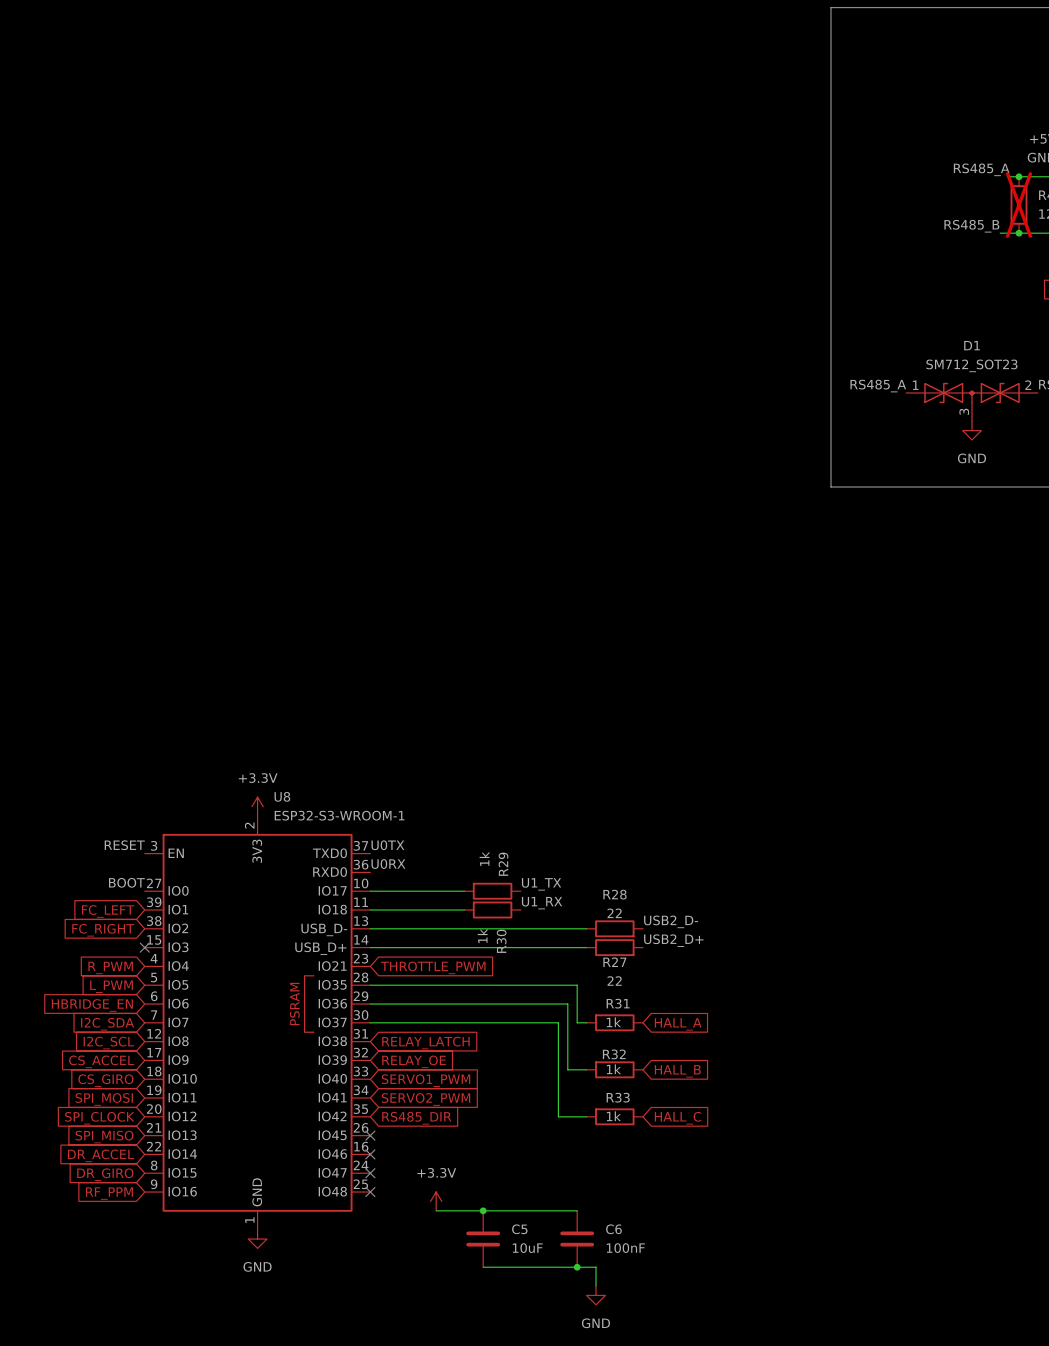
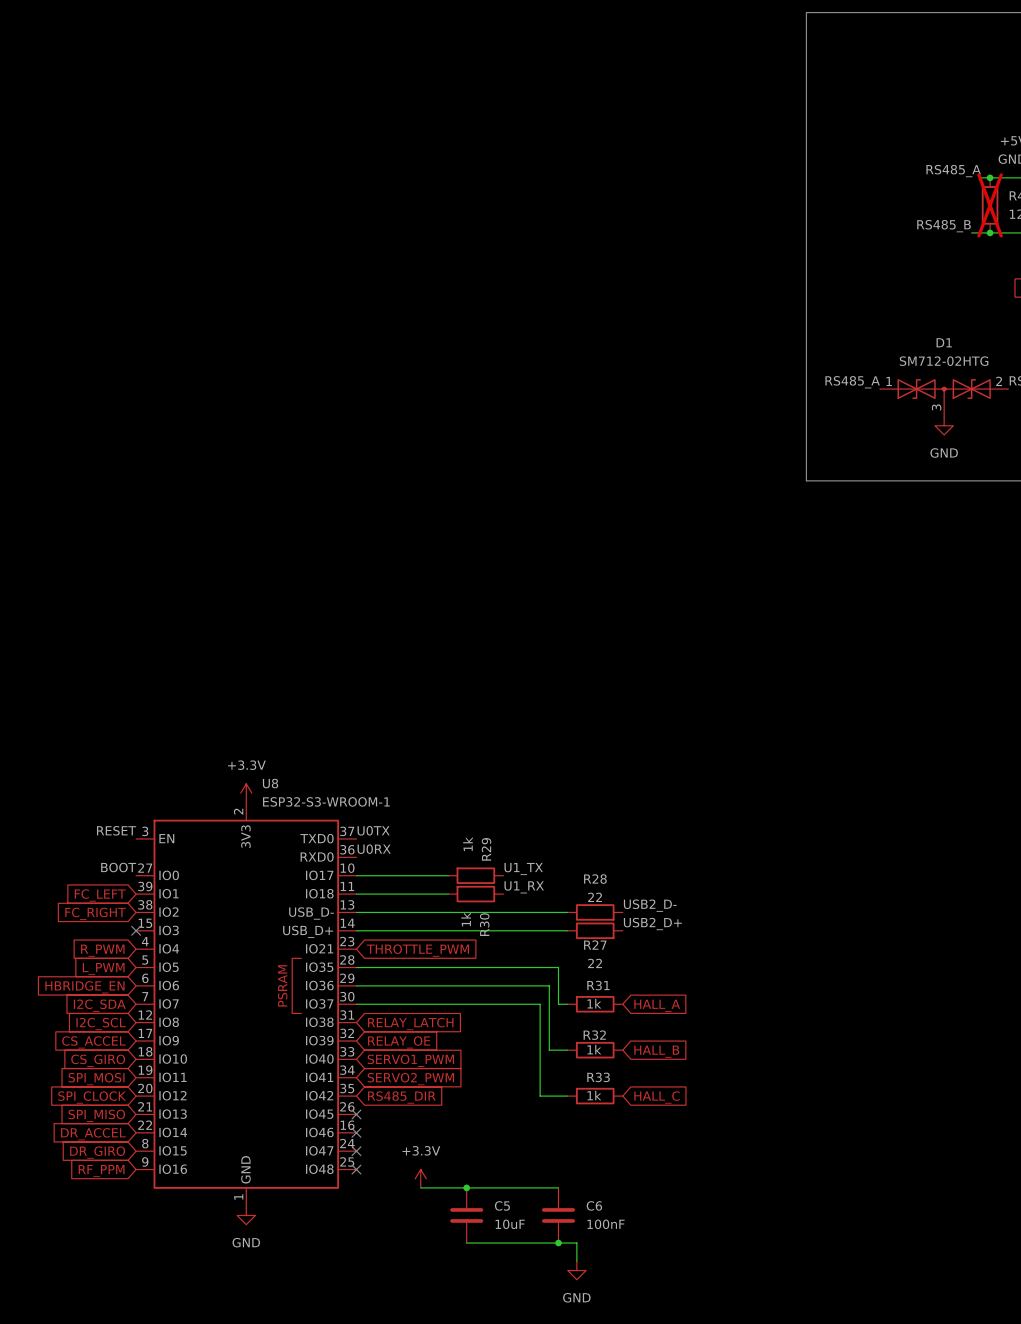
D1 value: SM712_SOT23 (971, 365) -> SM712-02HTG (944, 361)

